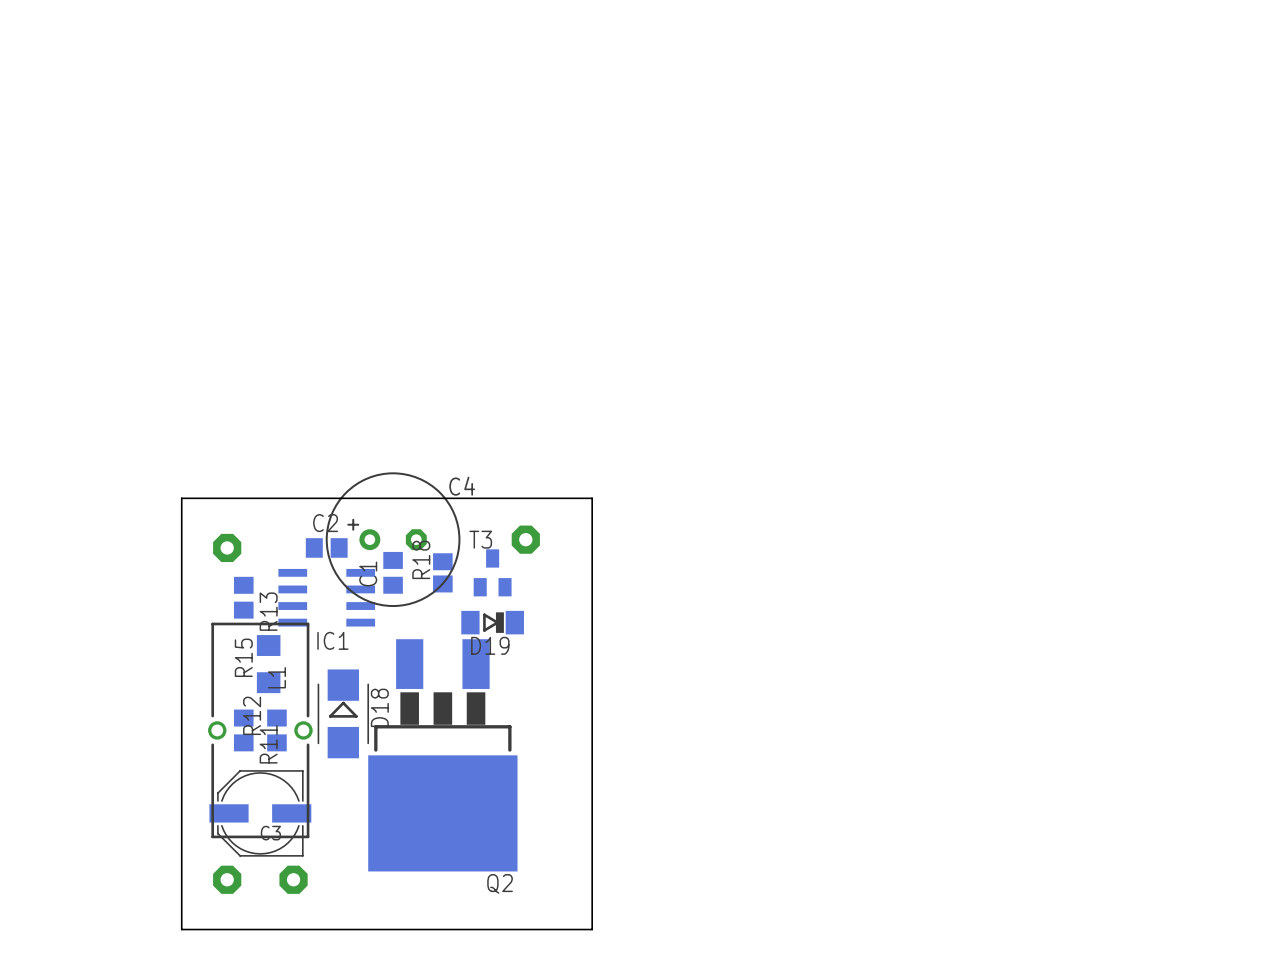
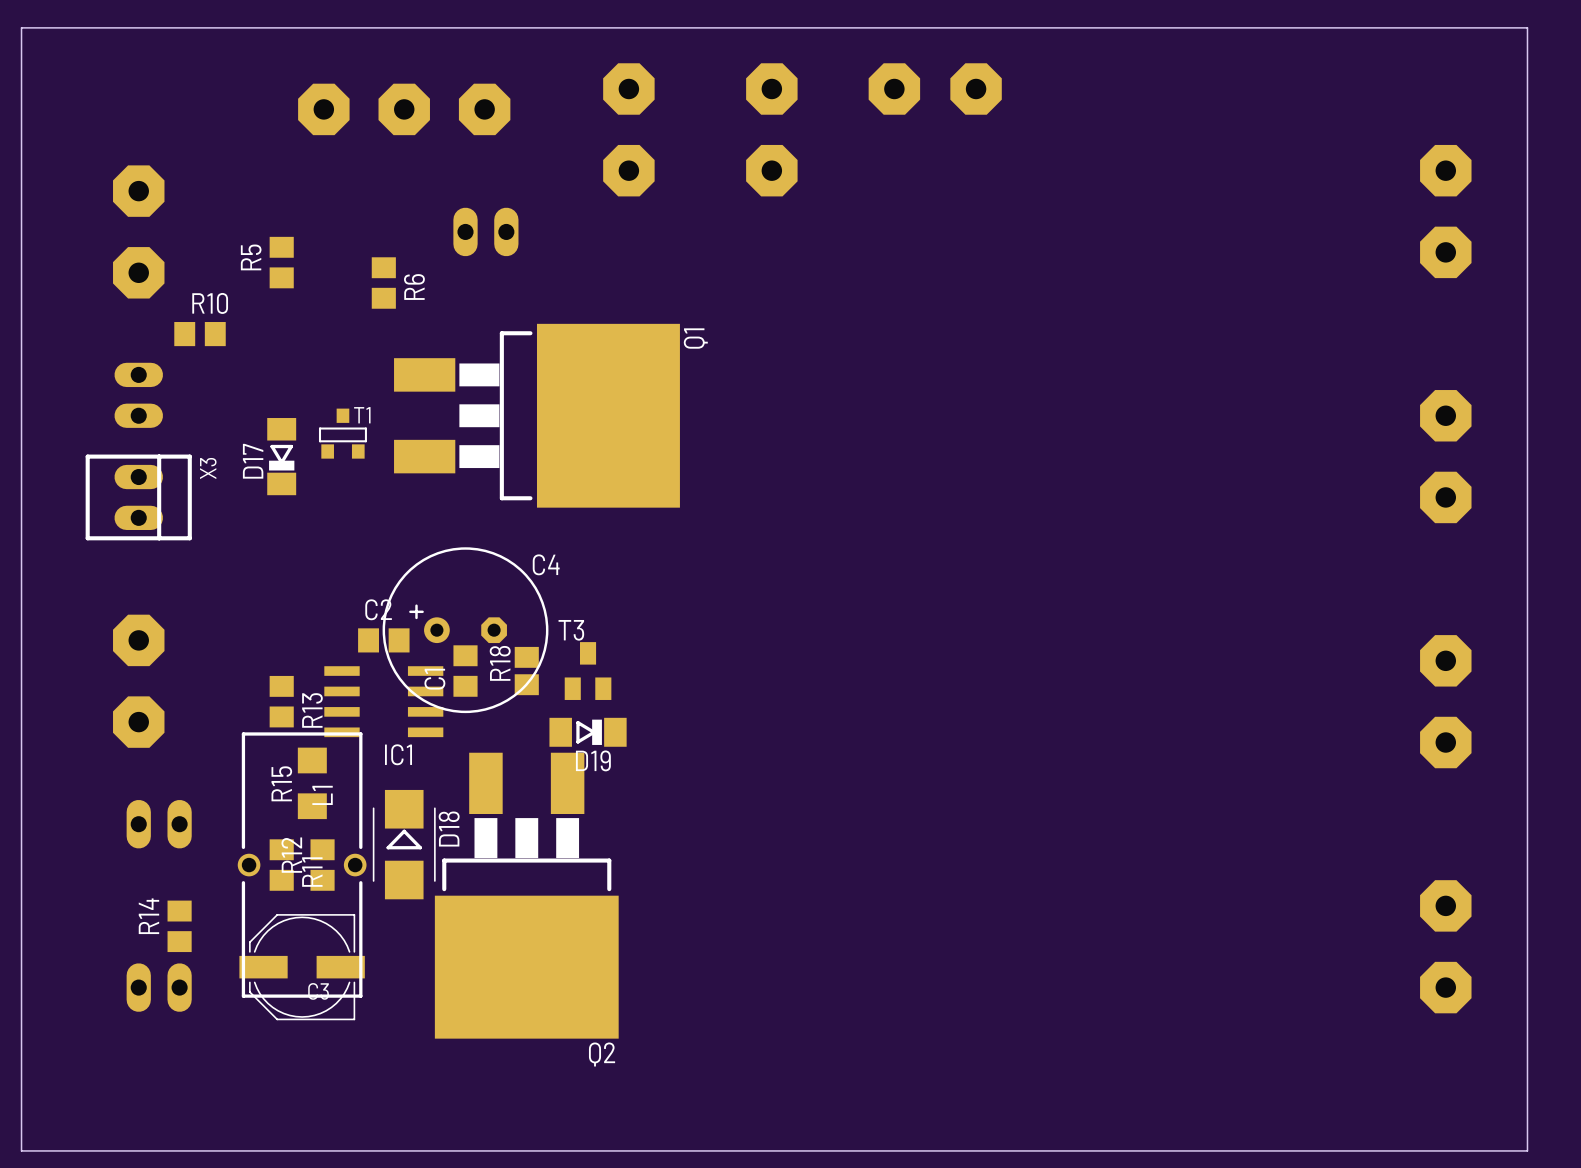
board edge: none -> (1527, 27) (21, 27) (21, 1150) (1527, 1150) (1527, 27)
part: none -> (935, 88)
part: none -> (404, 109)
part: none -> (628, 129)
part: none -> (771, 129)
part: none -> (1445, 211)
part: none -> (138, 231)
part: none -> (485, 231)
R5: none -> (281, 262)
R6: none -> (383, 283)
R10: none -> (200, 334)
part: none -> (138, 395)
Q1: none -> (536, 415)
T1: none -> (342, 433)
D17: none -> (281, 456)
part: none -> (1445, 456)
X3: none -> (138, 497)
board edge: (592, 498) (181, 498) (181, 929) (592, 929) (592, 498) -> none
part: (525, 539) -> none
part: (227, 547) -> none
part: none -> (138, 681)
part: none -> (1445, 701)
part: none -> (159, 824)
R14: none -> (179, 926)
part: none -> (1445, 946)
part: none -> (159, 987)
part: (227, 879) -> none
part: (293, 879) -> none

